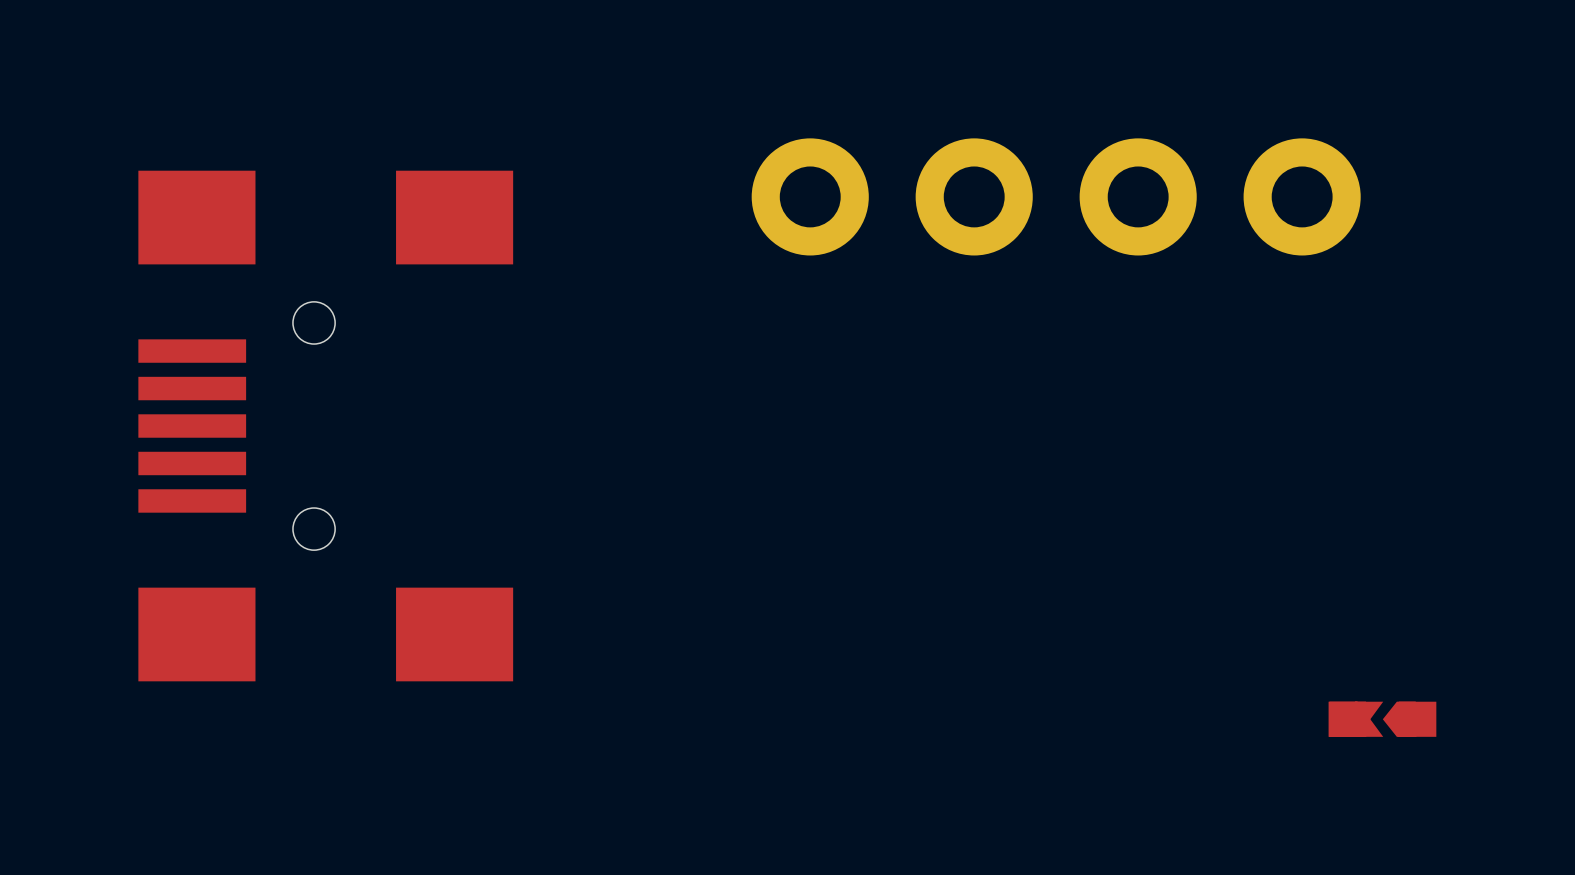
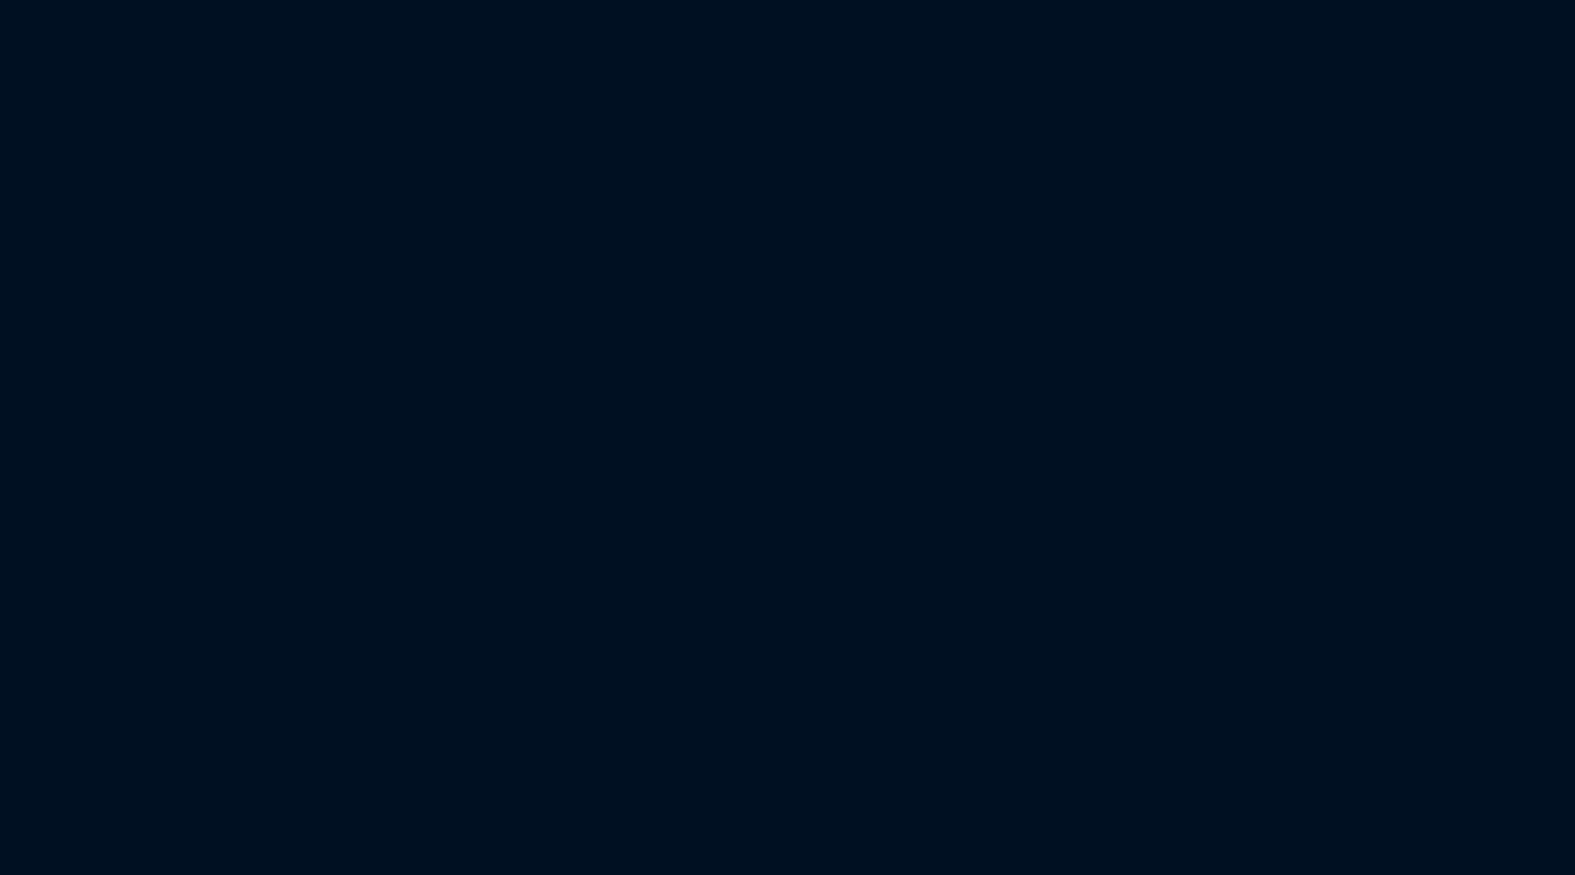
part: (1056, 196) -> none
part: (325, 426) -> none
part: (1382, 719) -> none

